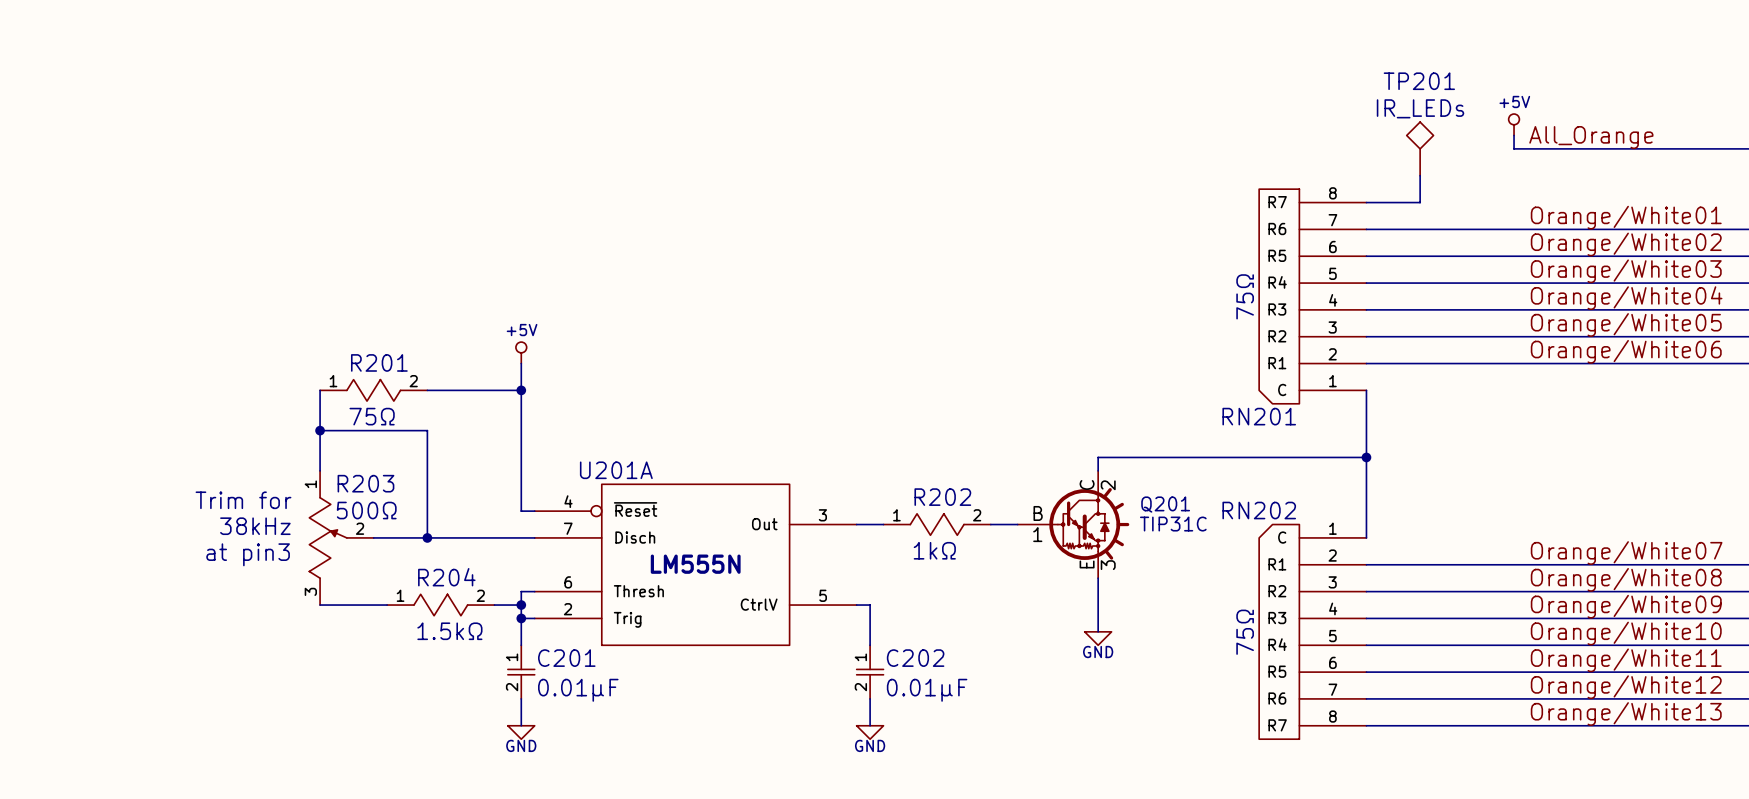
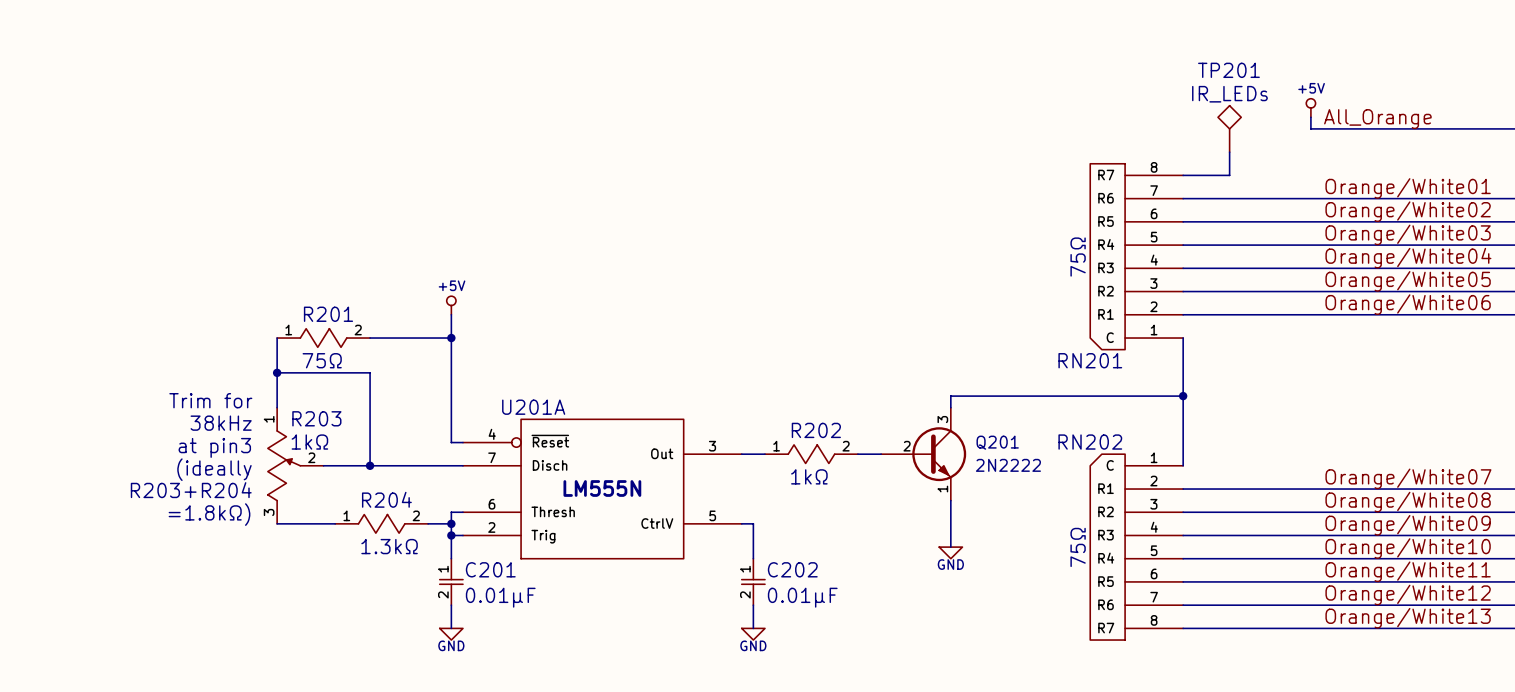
Q201 symbol: [1017, 470, 1130, 579] -> [881, 407, 967, 501]
text position: Trim for (243, 500) -> Trim for (210, 400)
R203 value: 500Ω (366, 510) -> 1kΩ (309, 442)
Q201 value: TIP31C (1173, 524) -> 2N2222 (1008, 465)
text position: 38kHz (255, 526) -> 38kHz (221, 423)
text: none -> (ideally (214, 469)
text position: at pin3 (248, 554) -> at pin3 (214, 447)
text: none -> R203+R204 (191, 490)
text: none -> =1.8kΩ) (209, 514)
R204 value: 1.5kΩ (449, 631) -> 1.3kΩ (389, 546)

